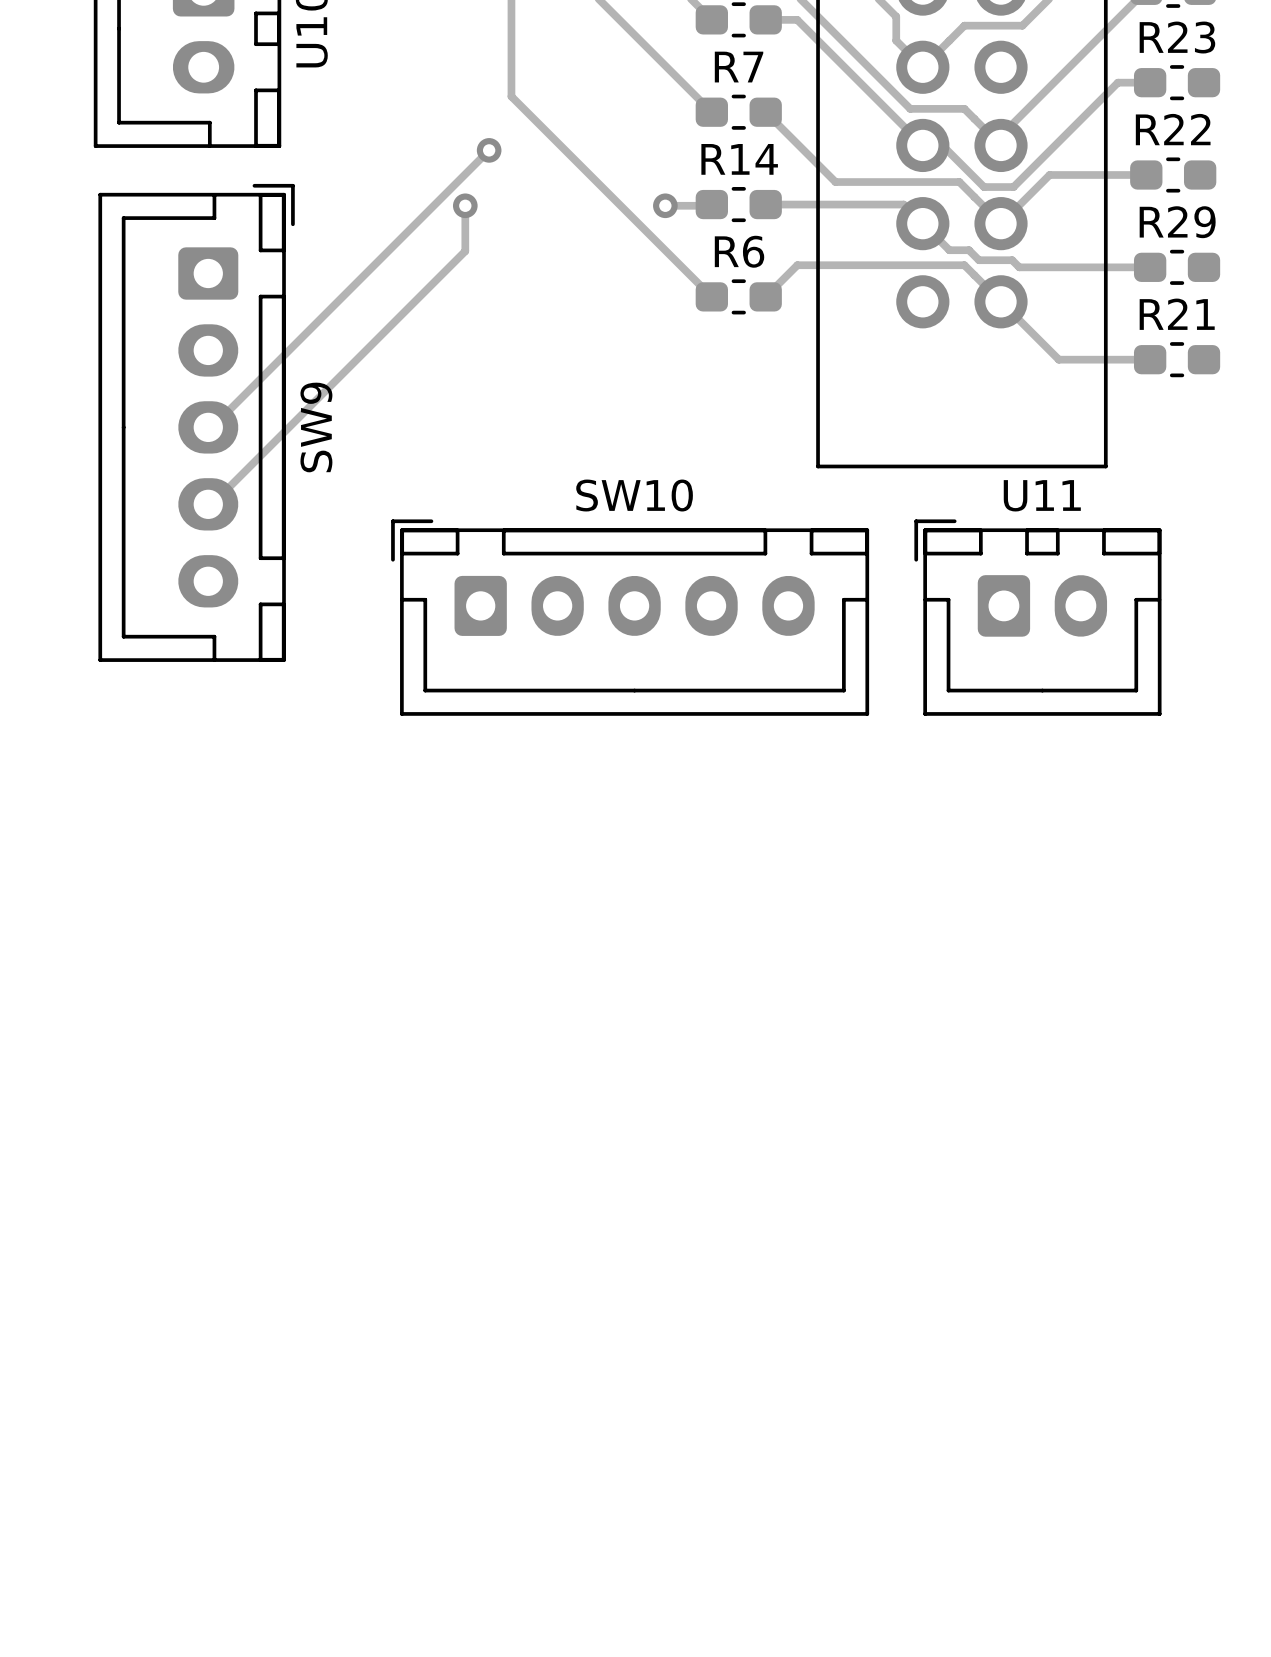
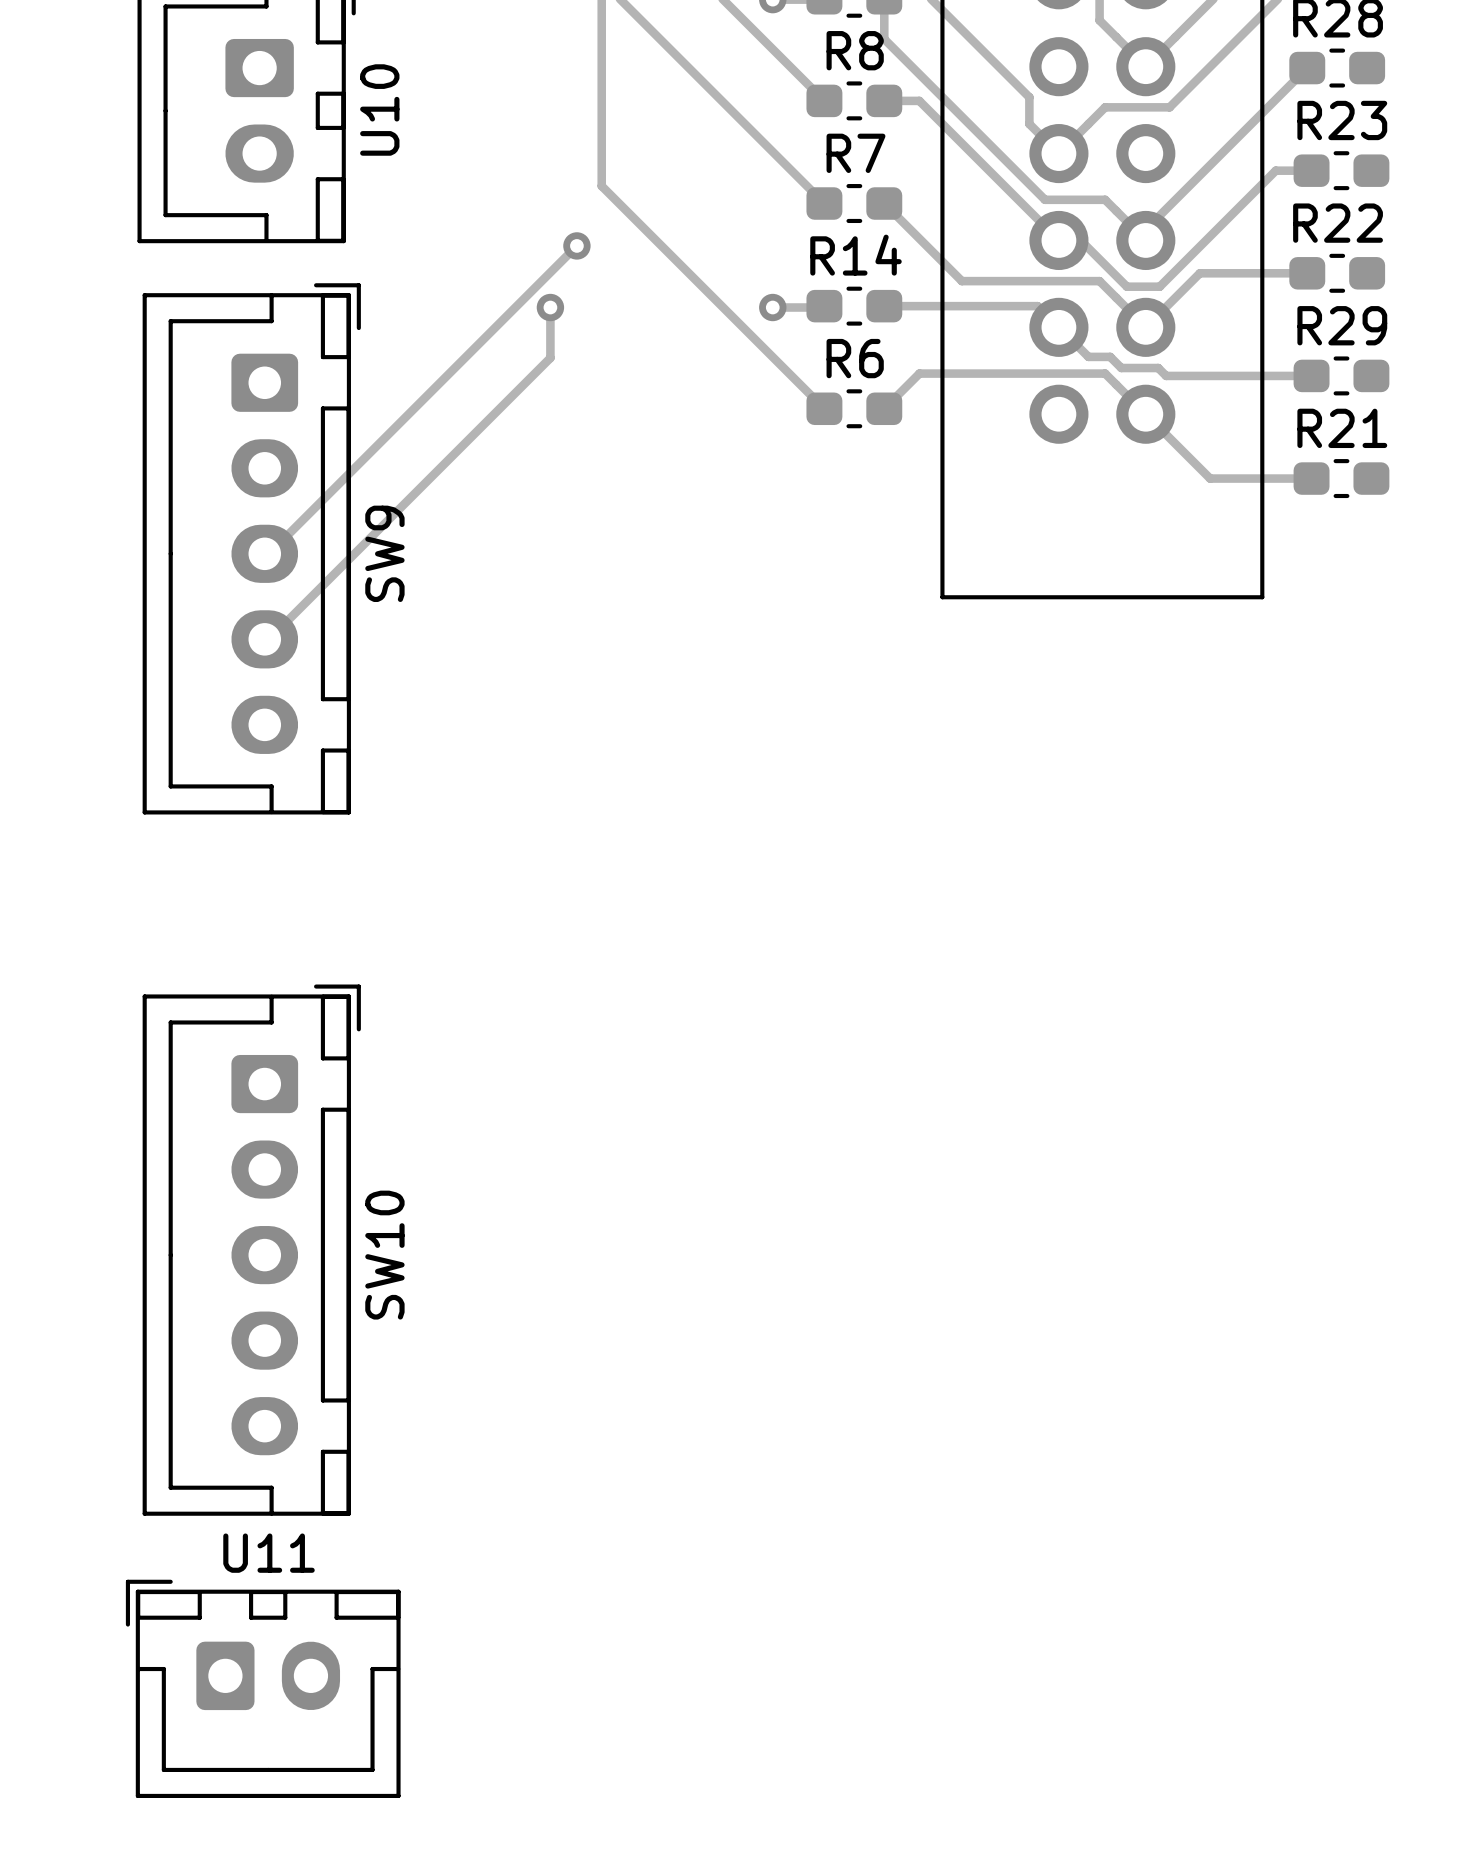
SW10 rotation: 0° (630, 617) -> 90° clockwise (251, 1250)
SW10 position: (630, 617) -> (251, 1250)
U11 position: (1037, 617) -> (263, 1688)

